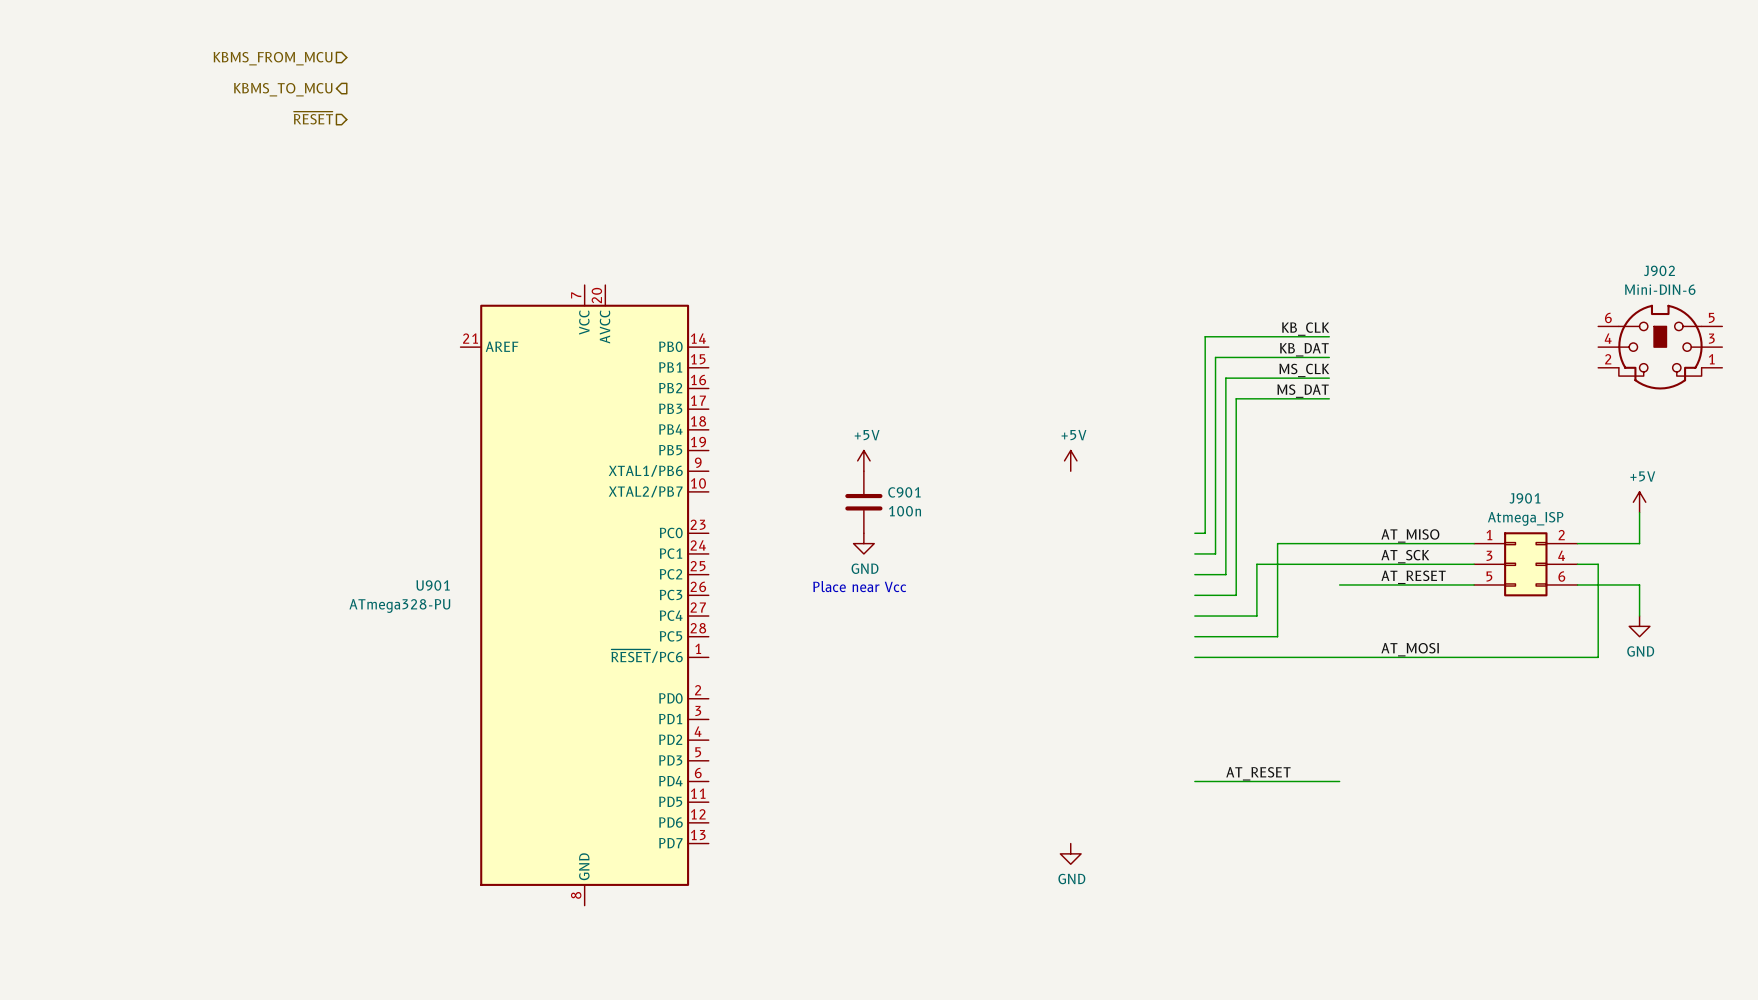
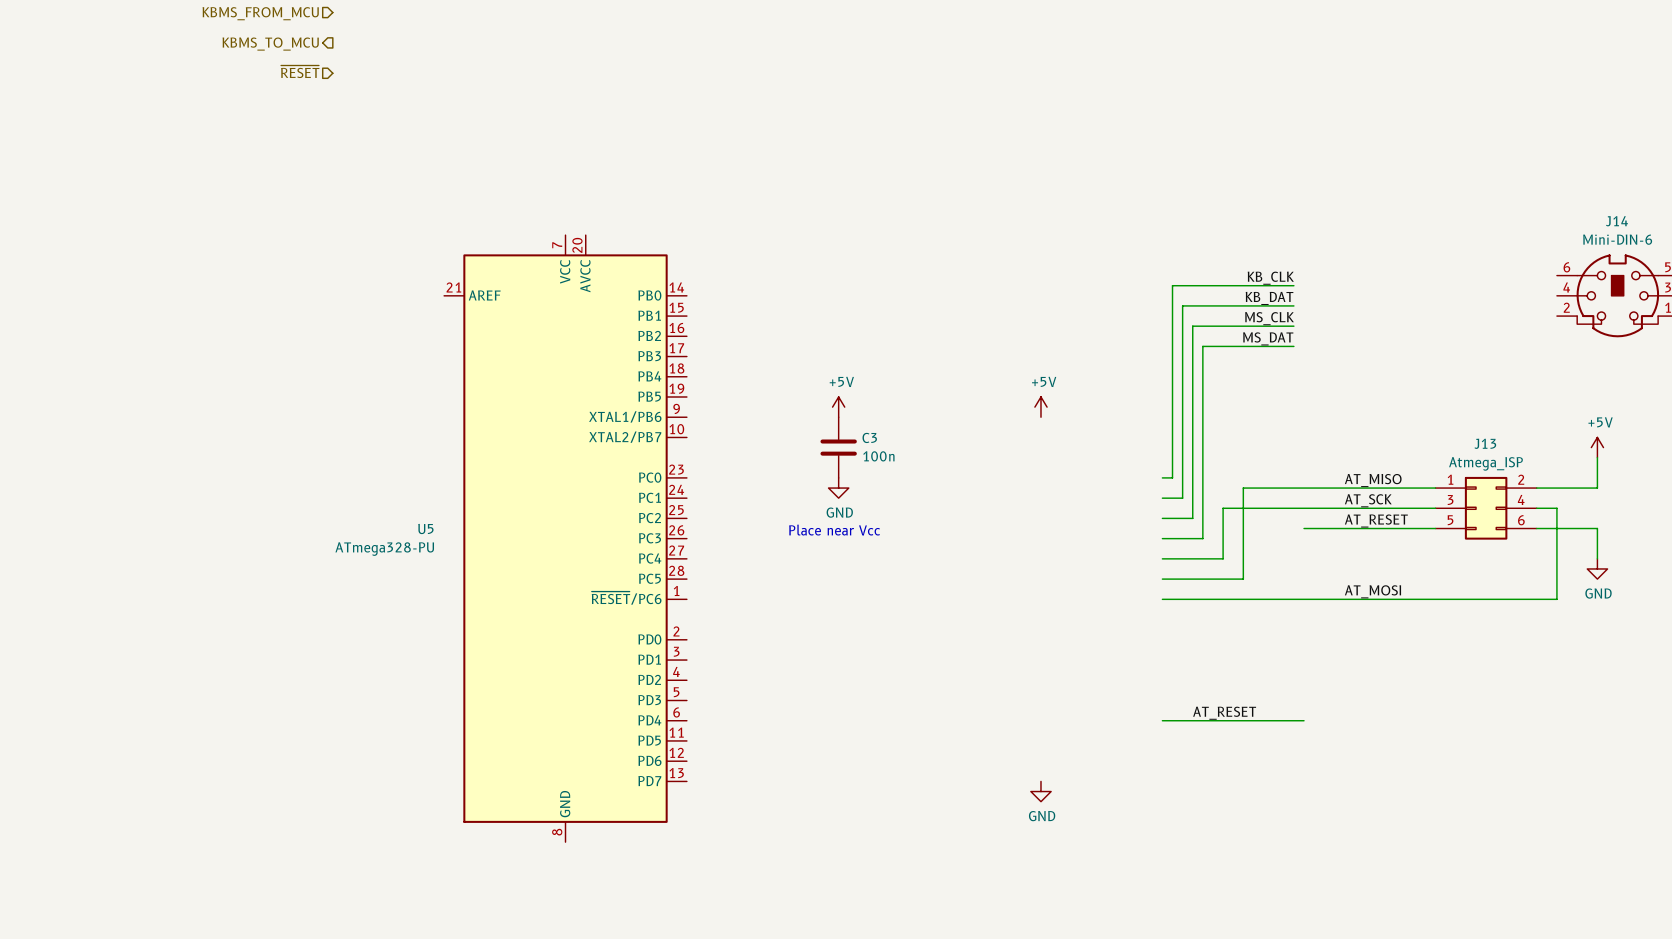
J902 name: J902 (1659, 270) -> J14 (1616, 221)
C901 name: C901 (904, 492) -> C3 (869, 437)
J901 name: J901 (1524, 498) -> J13 (1485, 443)
U901 name: U901 (433, 585) -> U5 (425, 529)

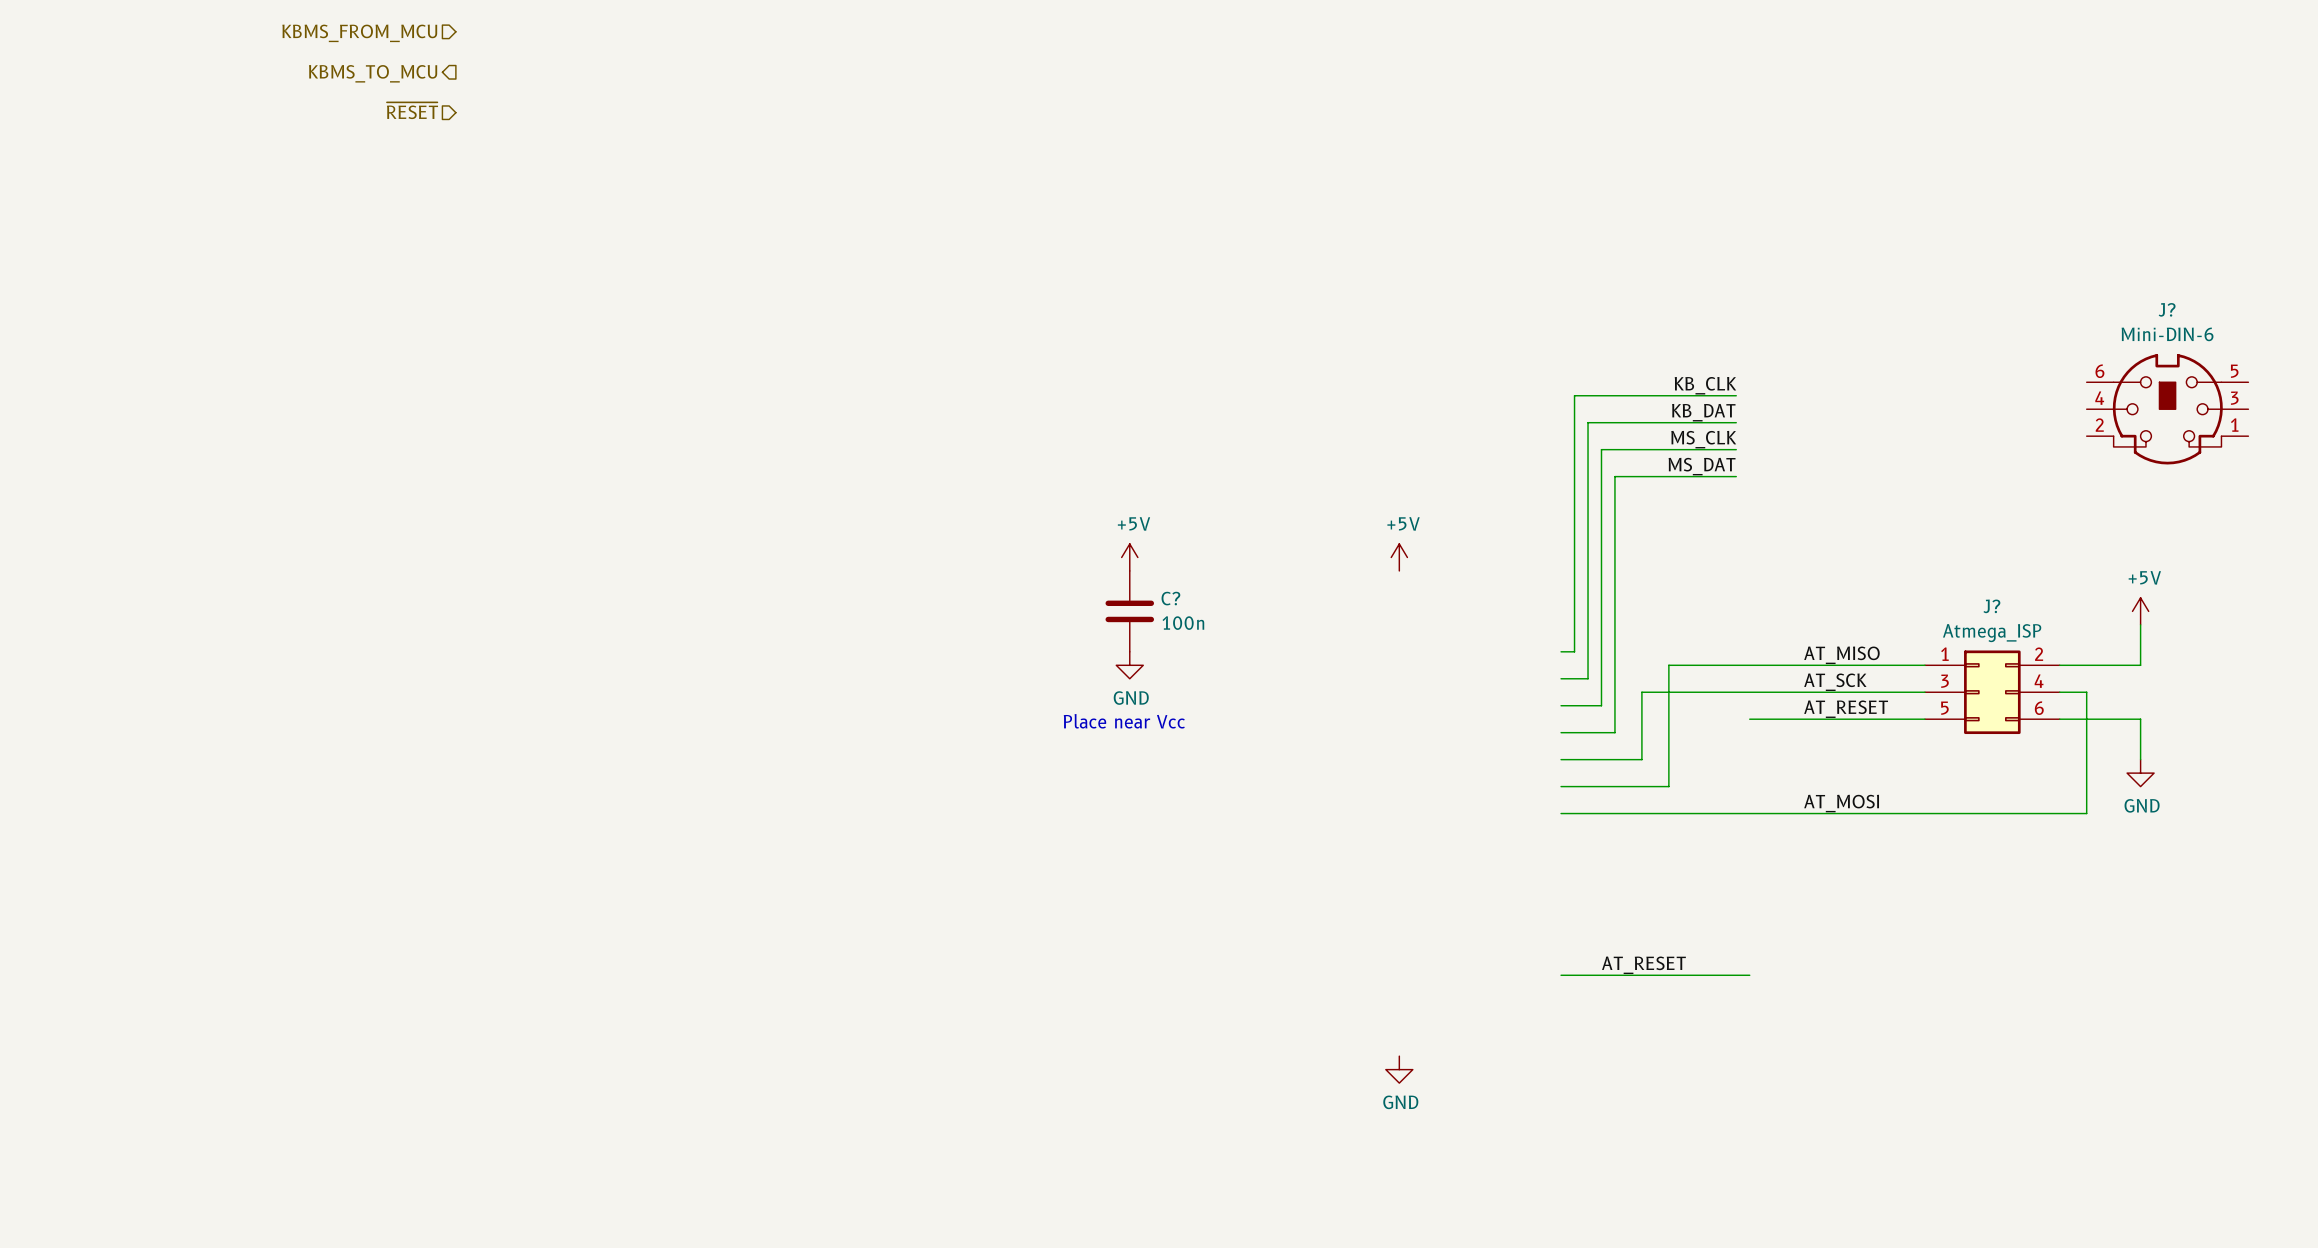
J14 name: J14 (1616, 221) -> J? (2167, 309)
C3 name: C3 (869, 437) -> C? (1170, 598)
J13 name: J13 (1485, 443) -> J? (1991, 606)
U5: ATmega328-PU (565, 538) -> none

